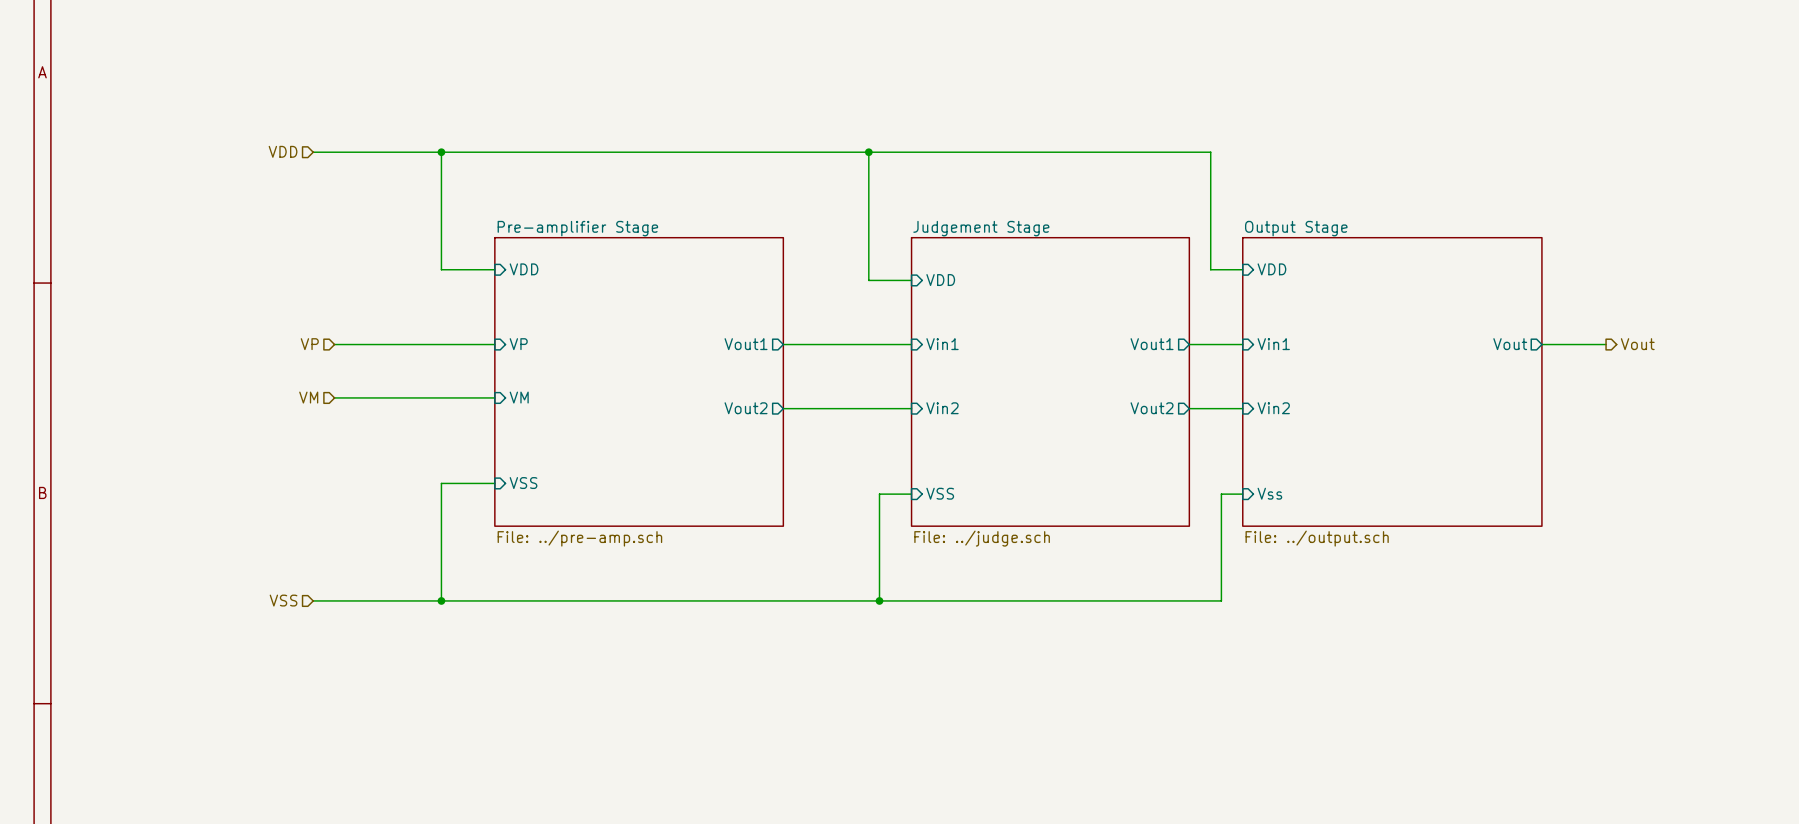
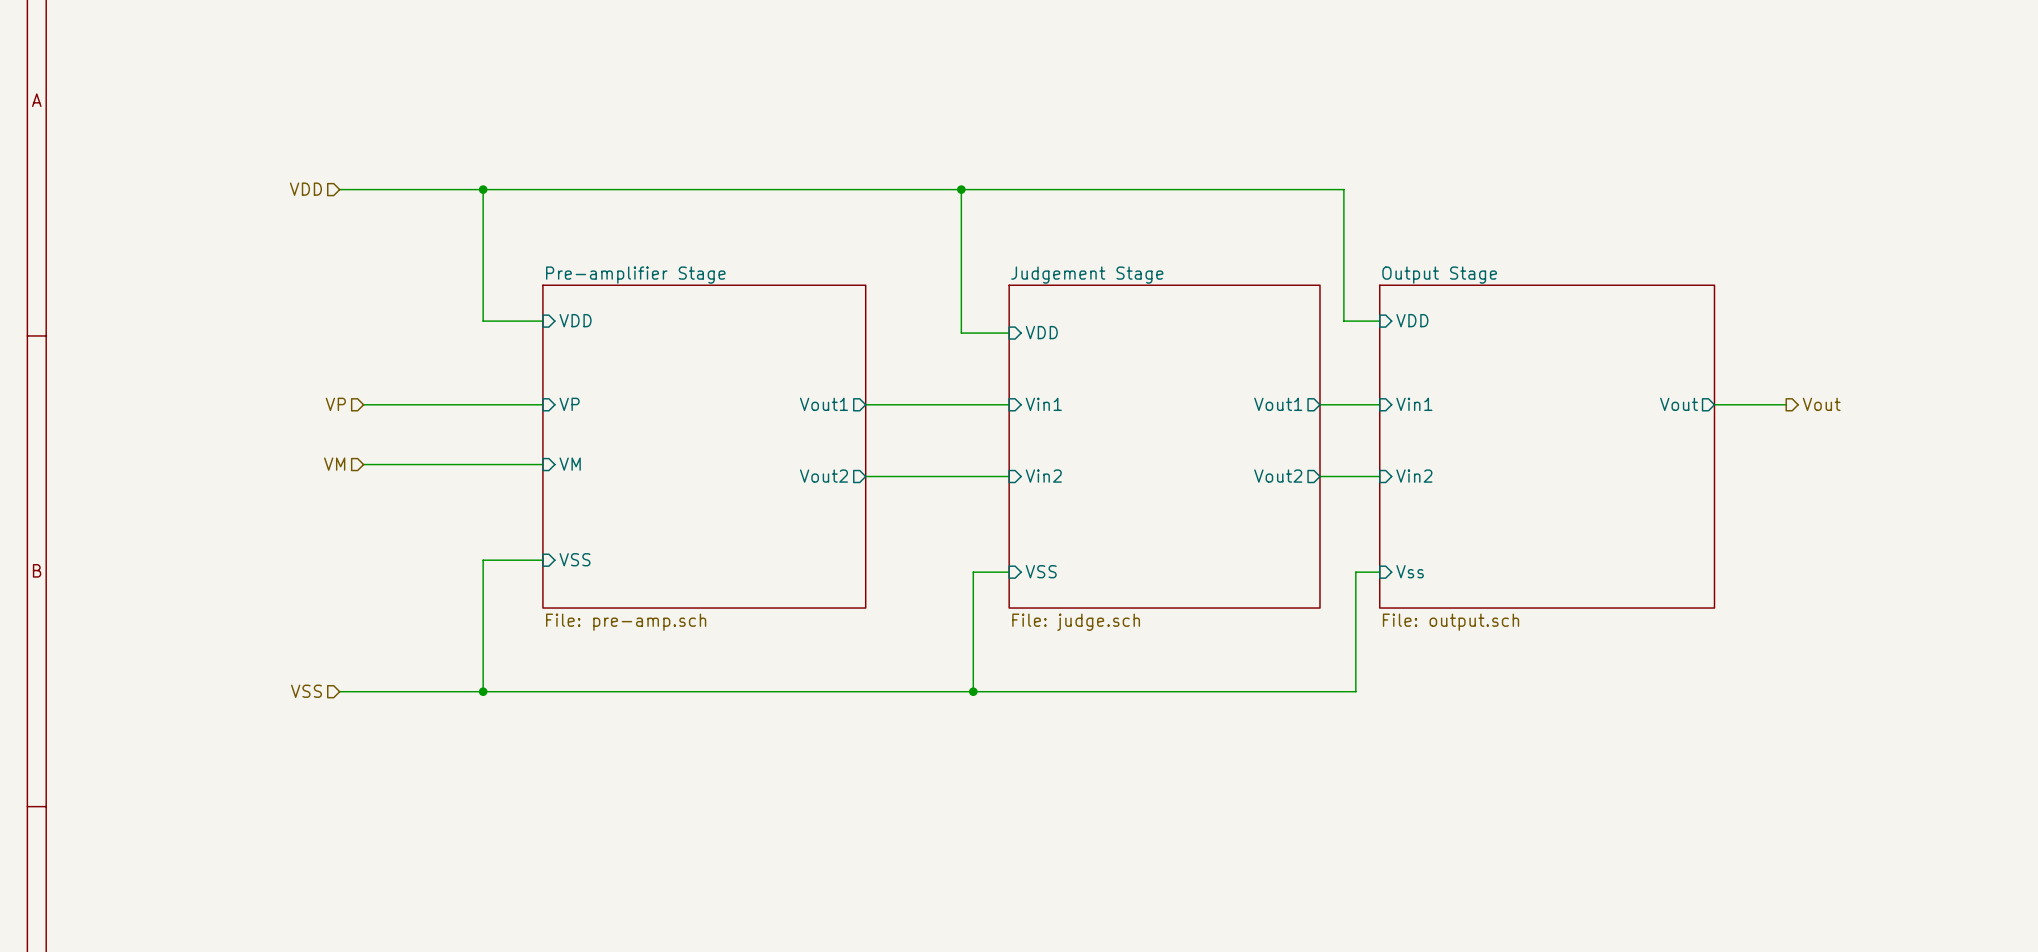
sheet Pre-amplifier Stage value: File: ../pre-amp.sch (579, 538) -> File: pre-amp.sch (626, 622)
sheet Judgement Stage value: File: ../judge.sch (982, 538) -> File: judge.sch (1076, 622)
sheet Output Stage value: File: ../output.sch (1317, 538) -> File: output.sch (1451, 622)

